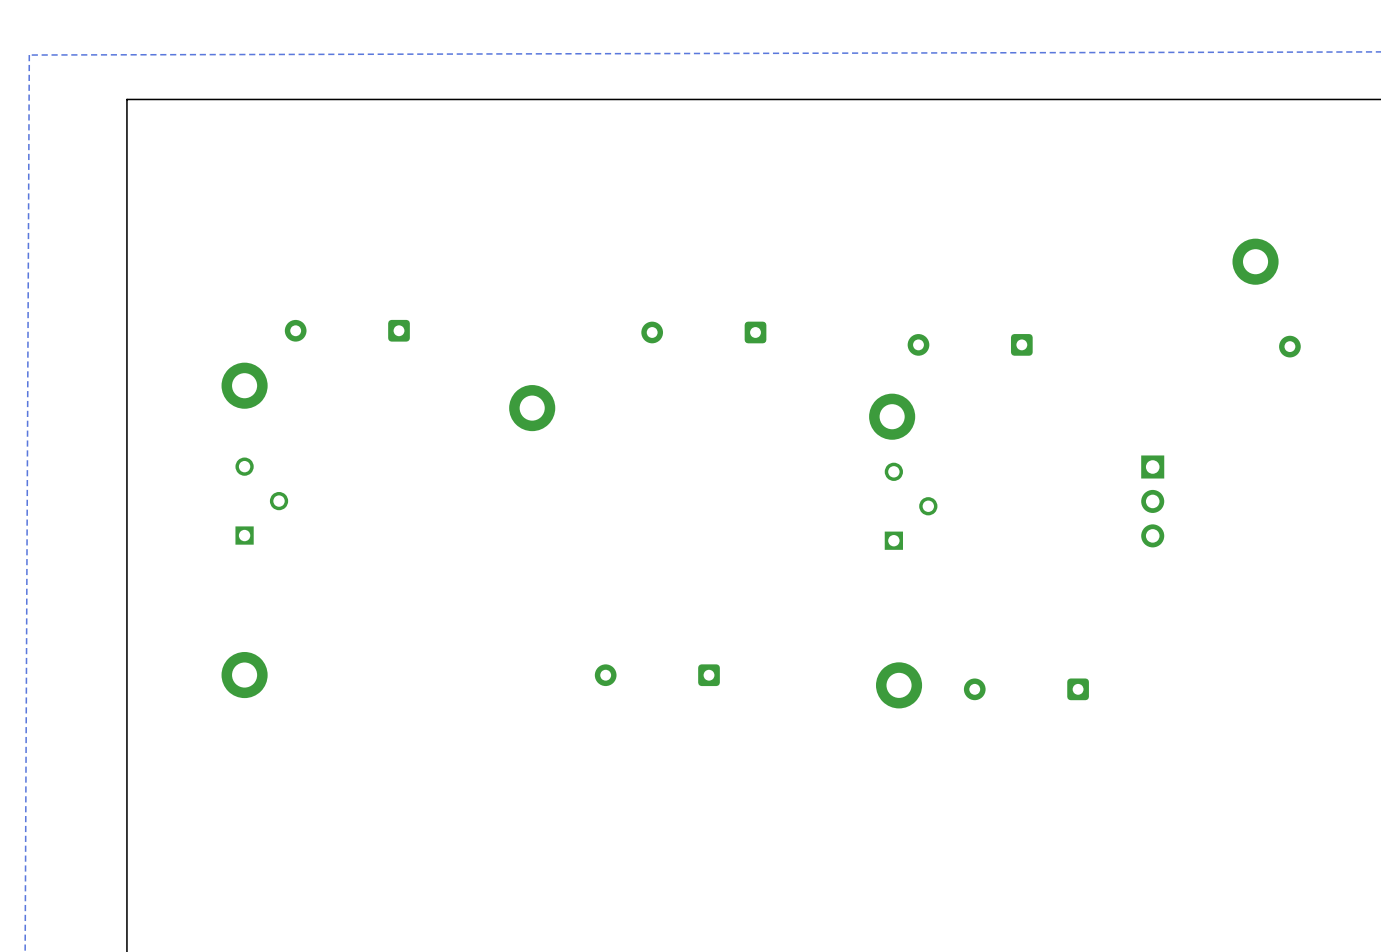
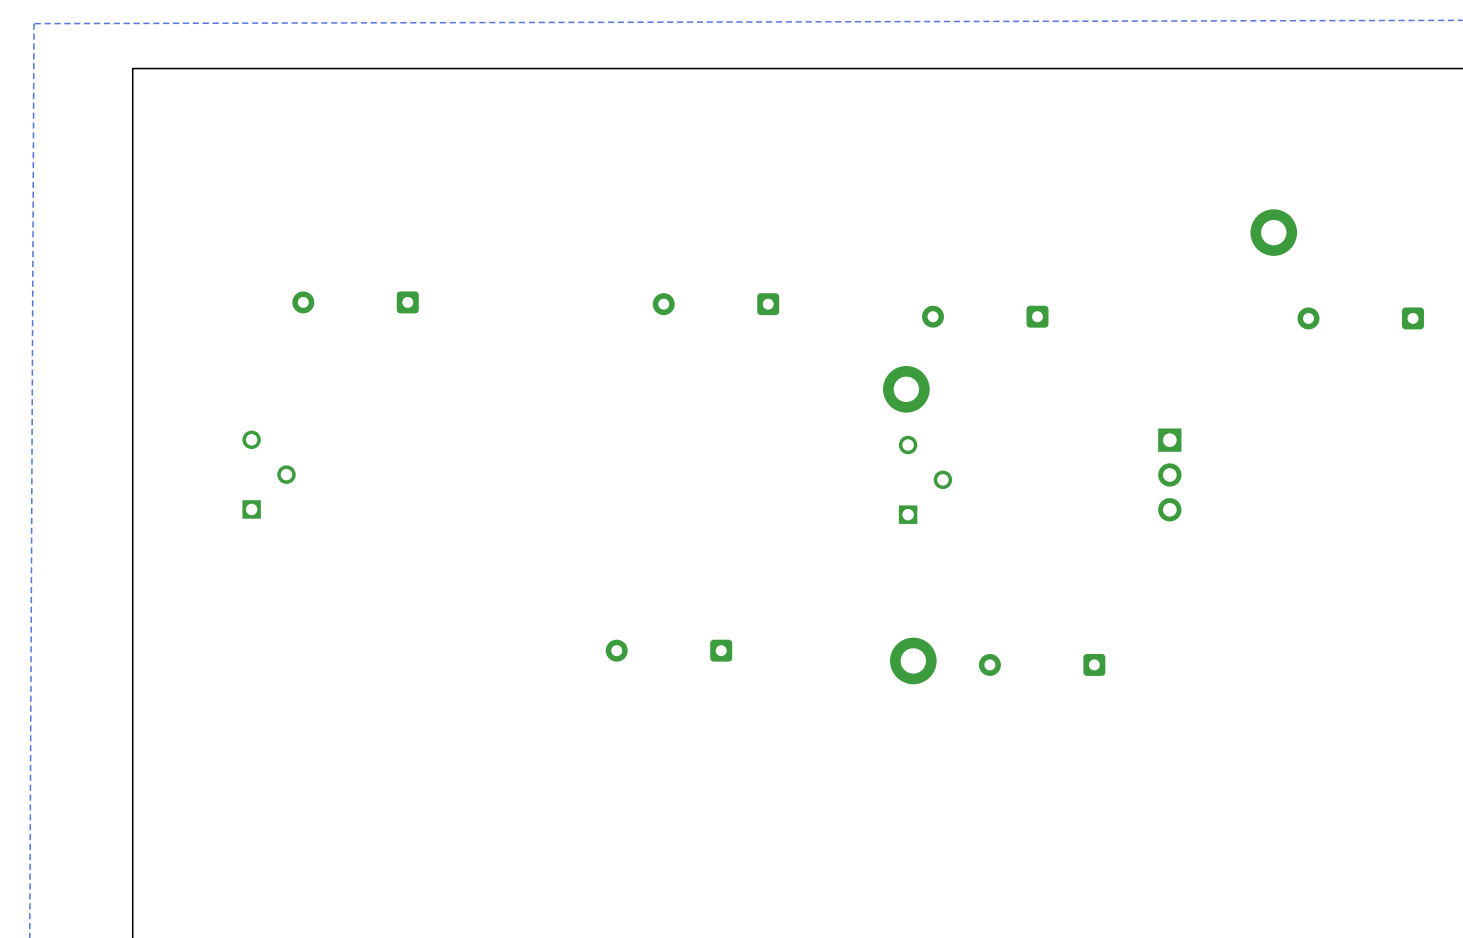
part: (244, 385) -> none
part: (532, 408) -> none
part: (244, 675) -> none

